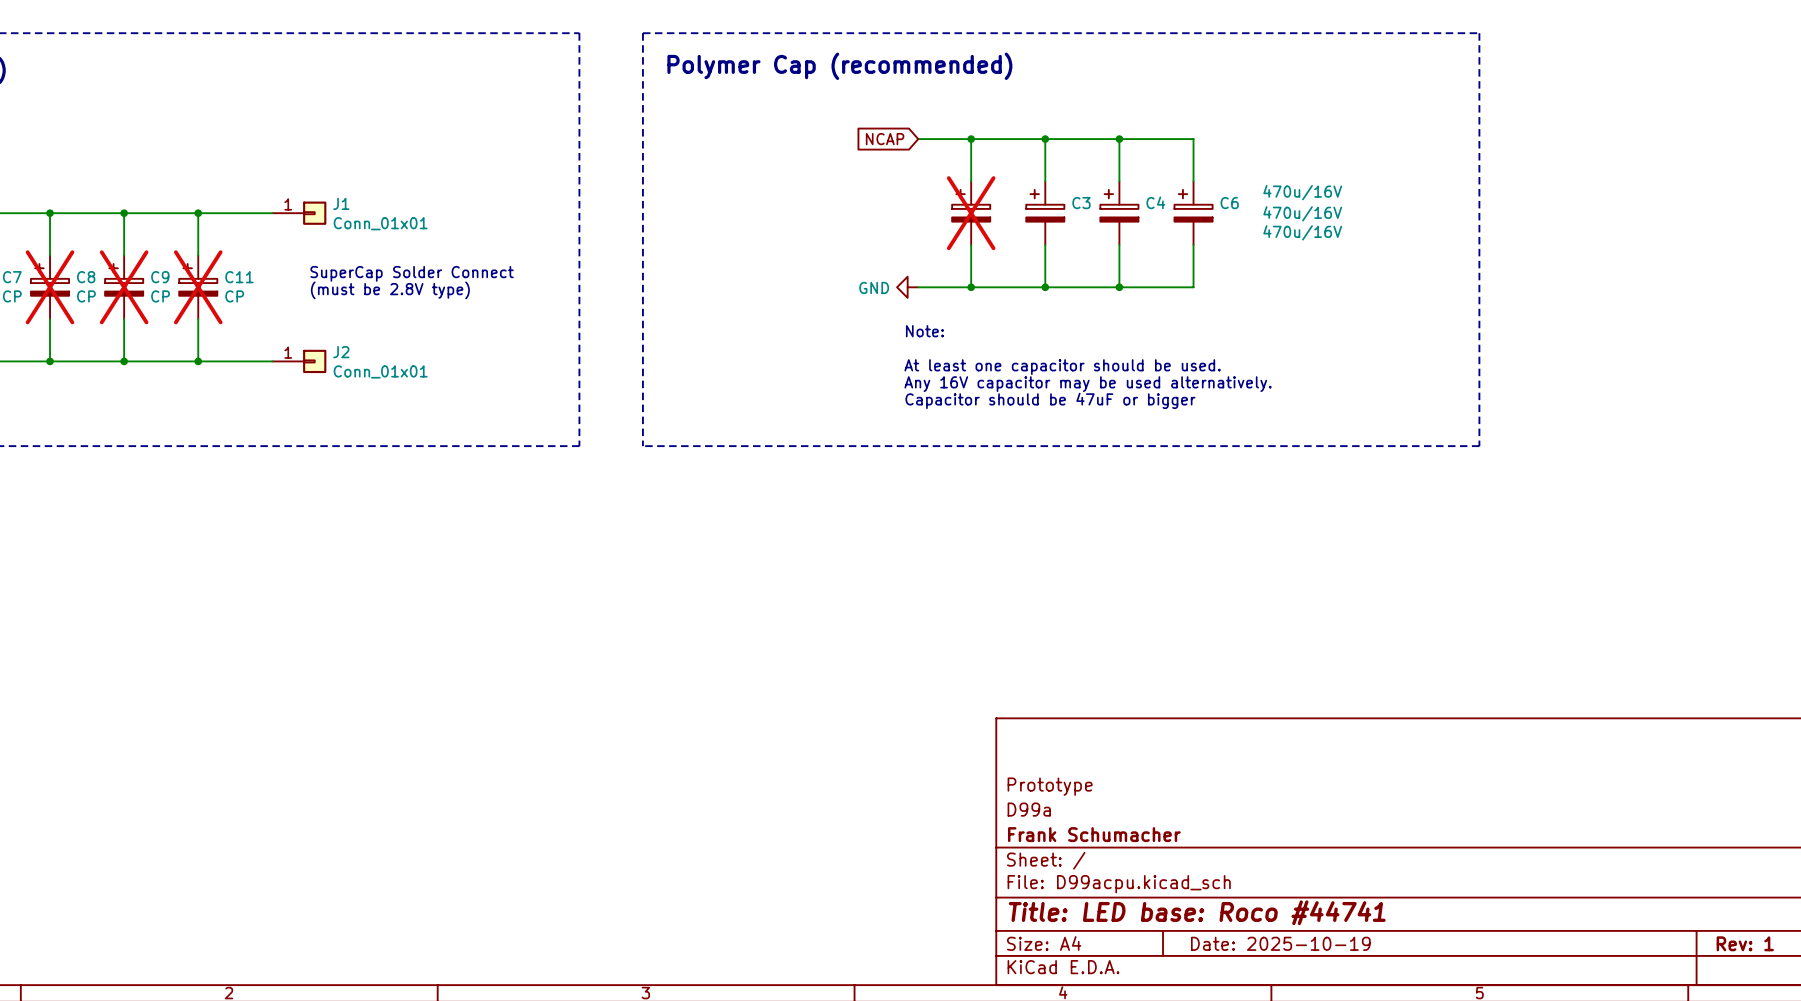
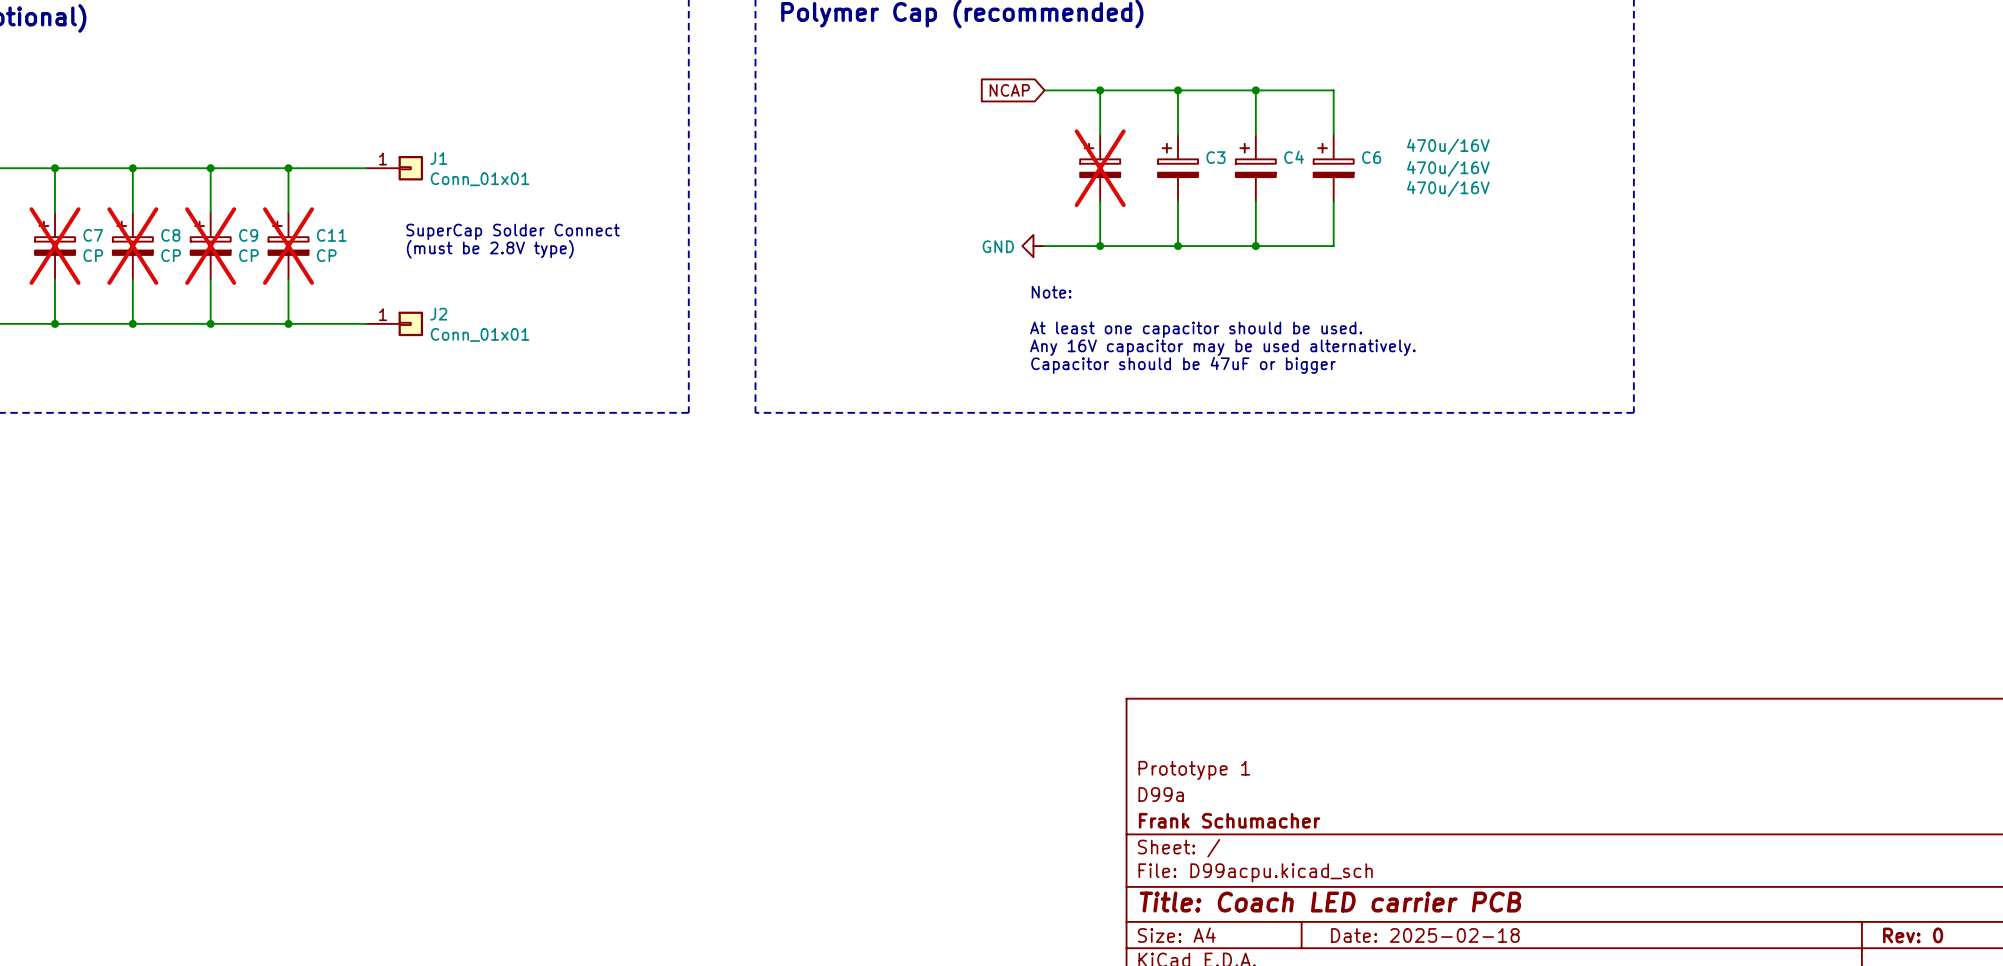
title block: Prototype (1050, 786) -> Prototype 1 (1194, 770)
title block: Title: LED base: Roco #44741 (1197, 912) -> Title: Coach LED carrier PCB (1330, 902)
title block: Date: 2025-10-19 (1280, 943) -> Date: 2025-02-18 (1425, 935)
title block: Rev: 1 (1745, 943) -> Rev: 0 (1913, 935)

